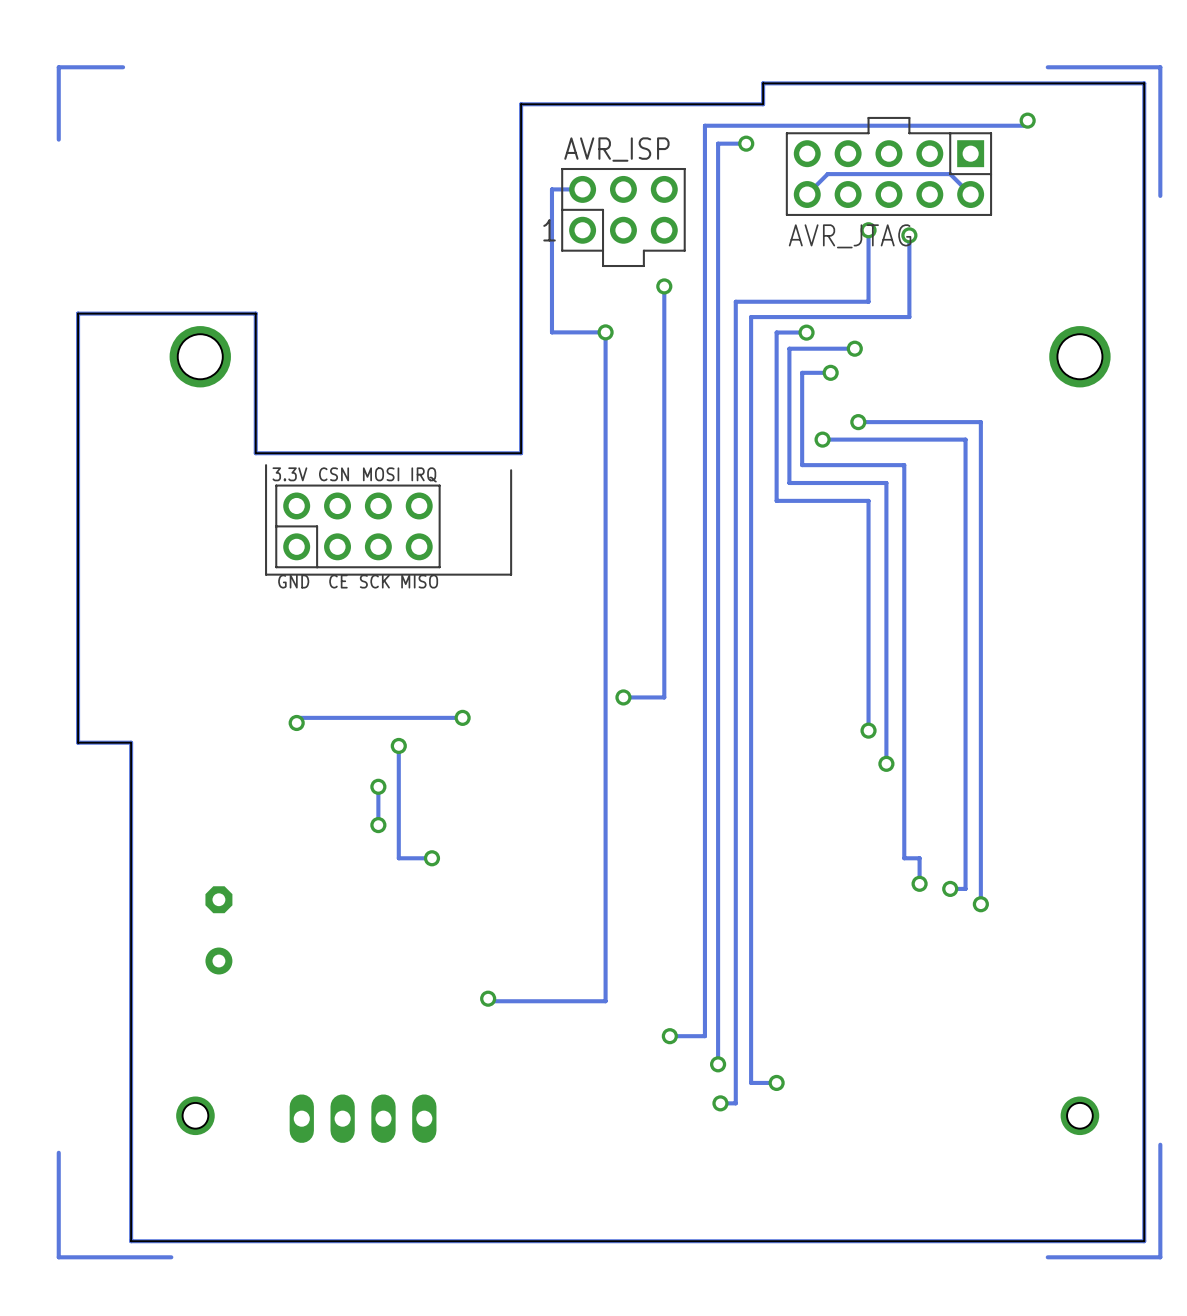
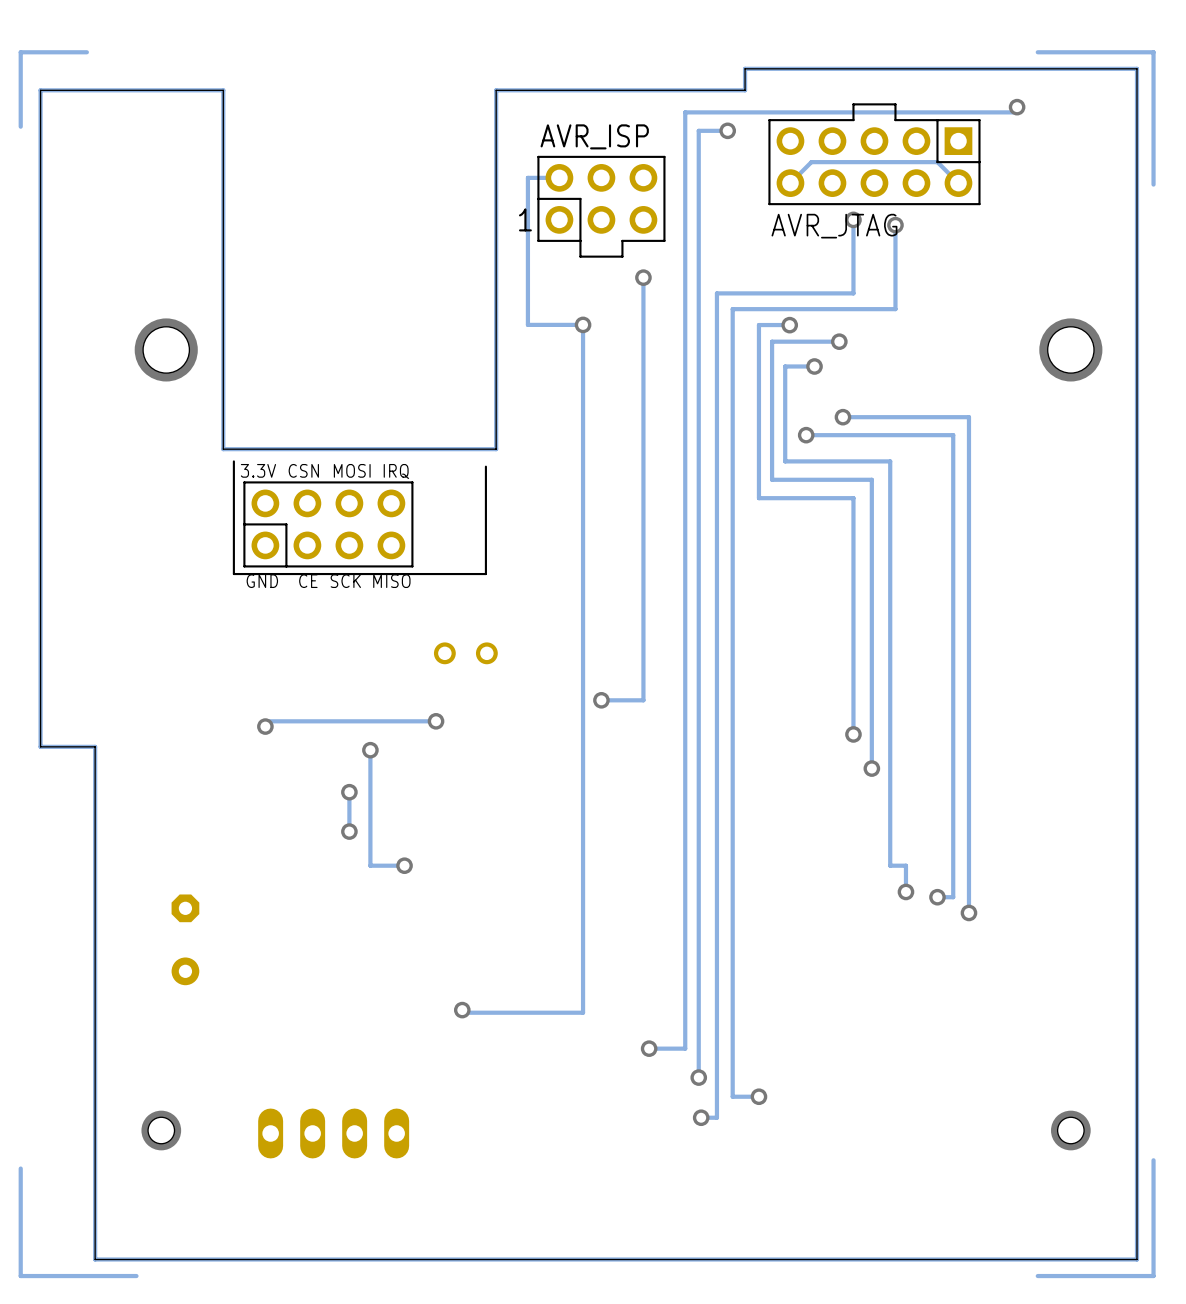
board edge: (255, 313) (78, 313) -> (223, 305) (223, 90) (40, 90) (40, 305)
track: (255, 313) (78, 313) -> (223, 305) (223, 90) (40, 90) (40, 305)
part: none -> (465, 653)

